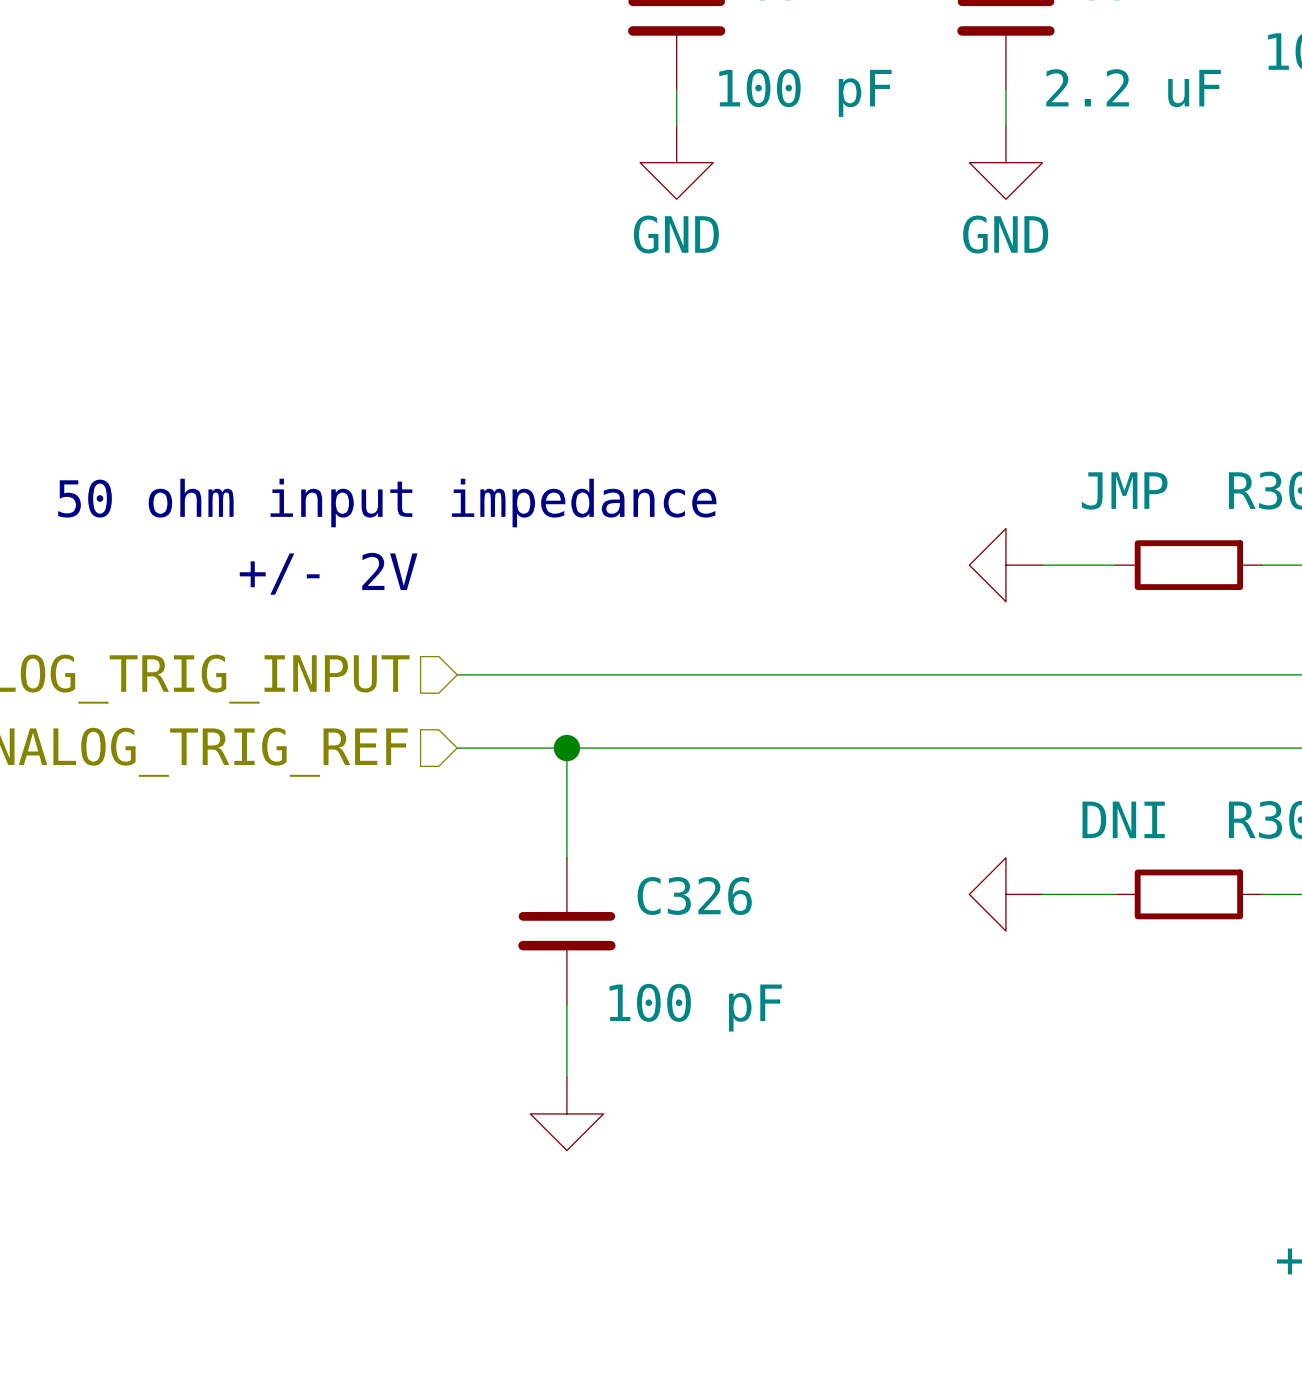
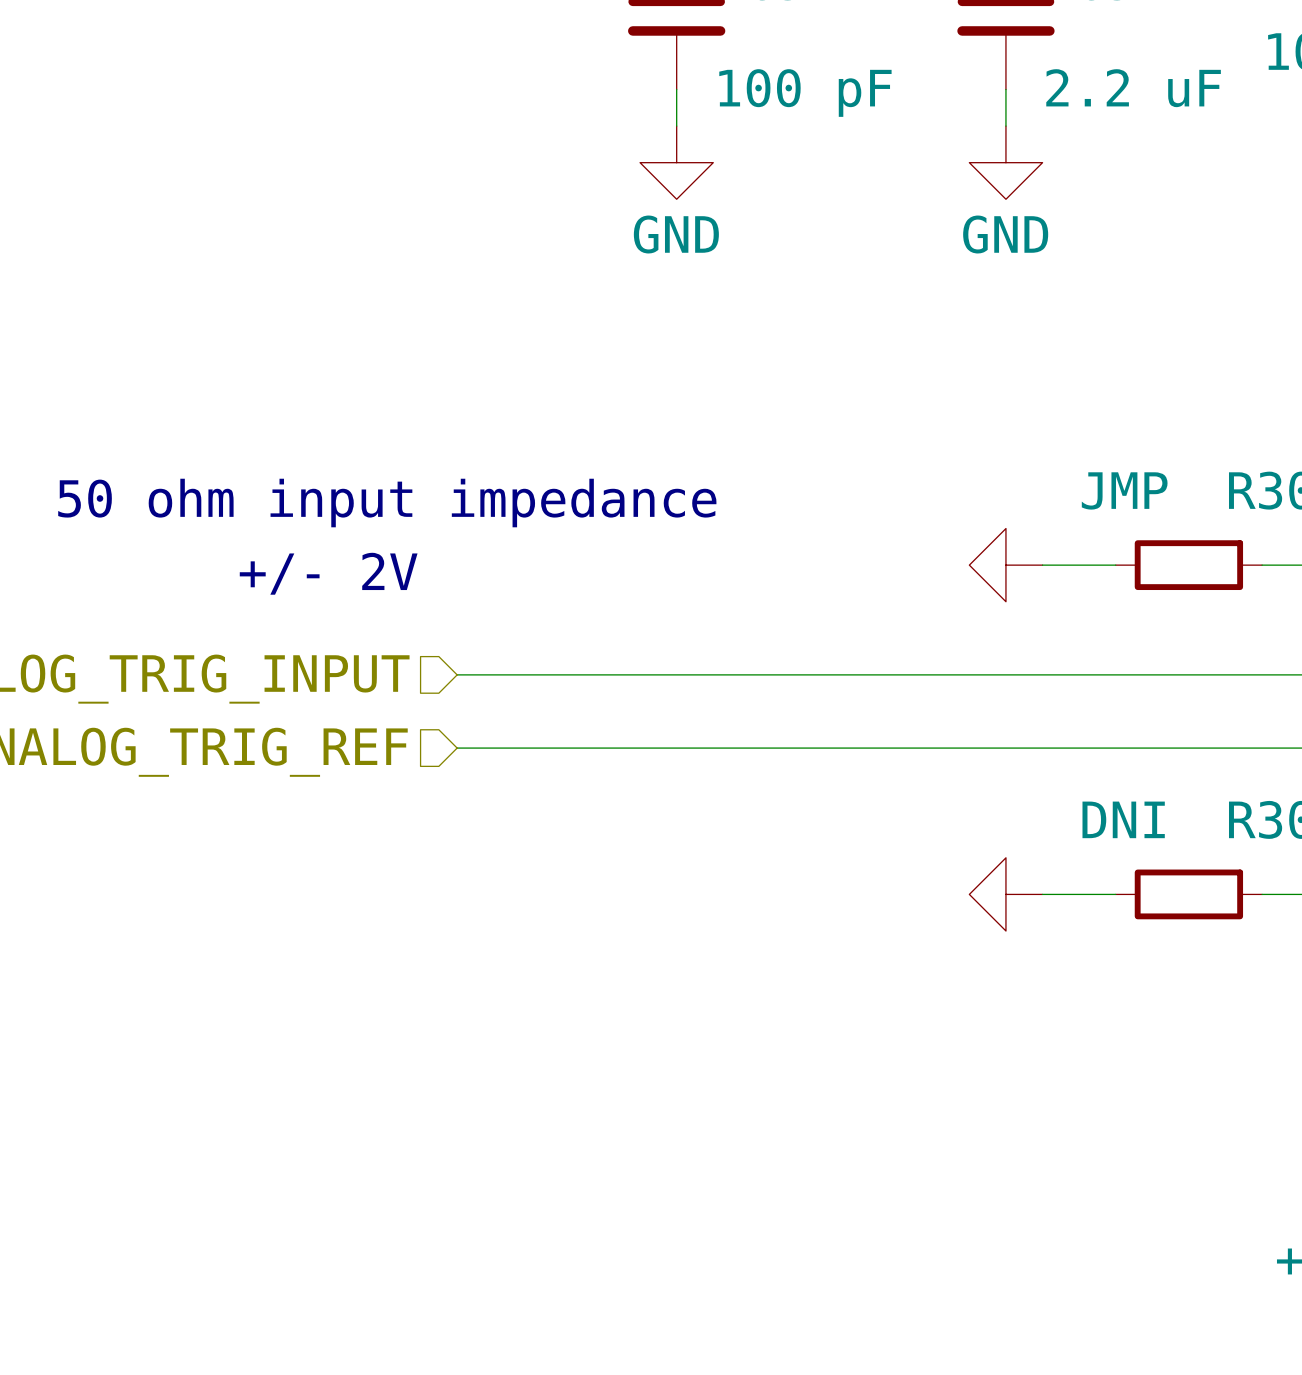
wire: (566, 748) (566, 857) -> none
junction: (566, 748) -> none
C326: 100 pF (566, 931) -> none
wire: (566, 1004) (566, 1077) -> none
power symbol: (566, 1113) -> none

